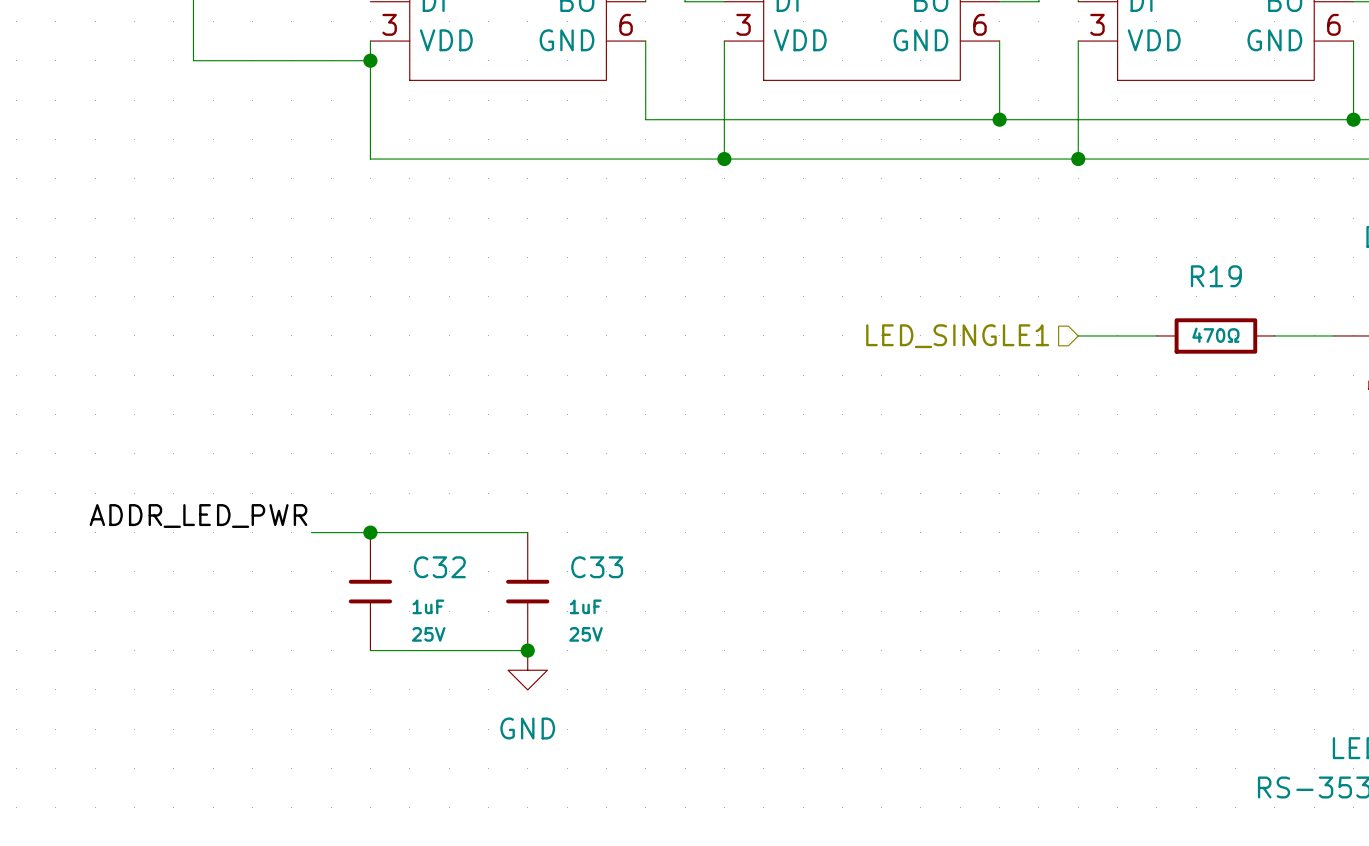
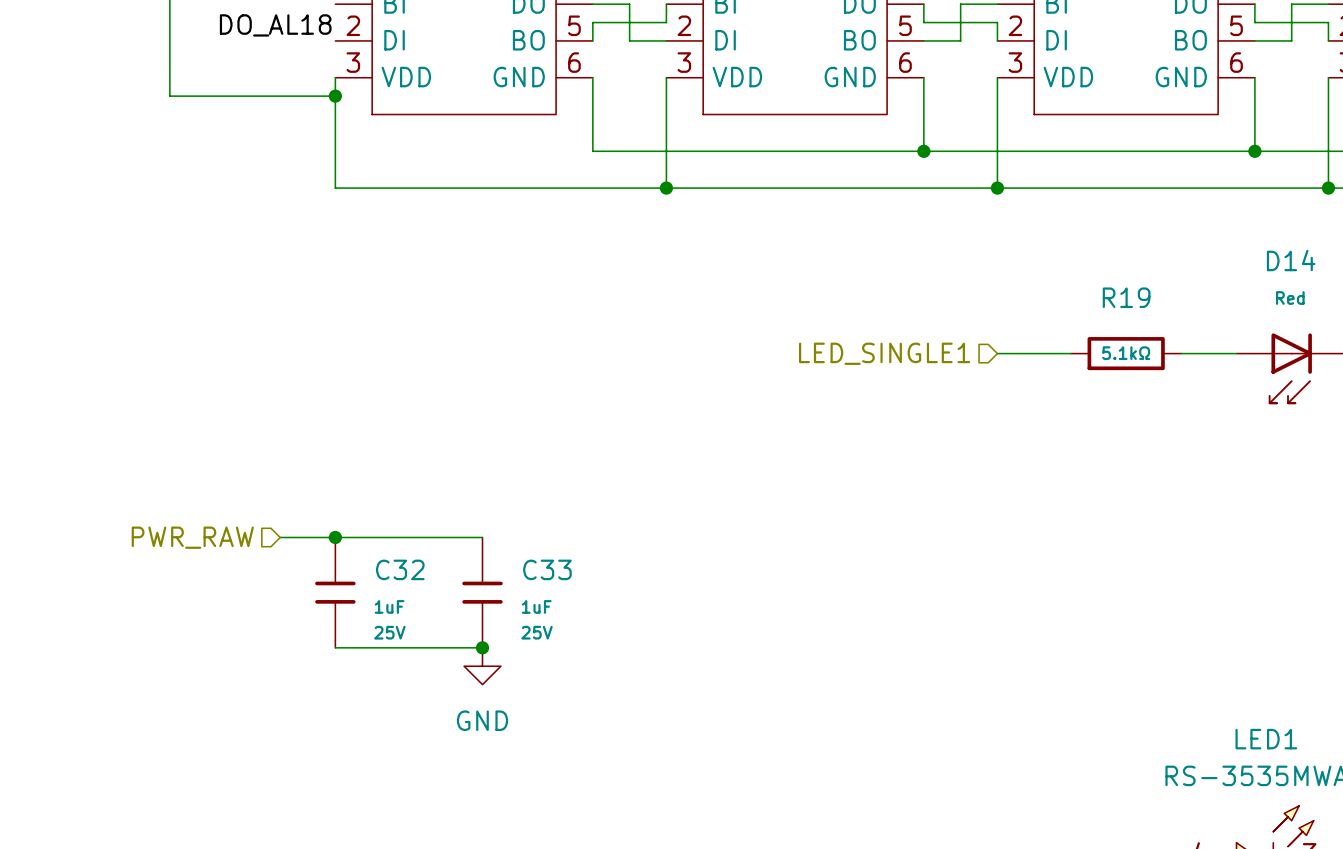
R19 value: 470Ω (1215, 335) -> 5.1kΩ (1126, 353)
label: ADDR_LED_PWR (198, 516) -> none
hierarchical label: none -> PWR_RAW (192, 537)

